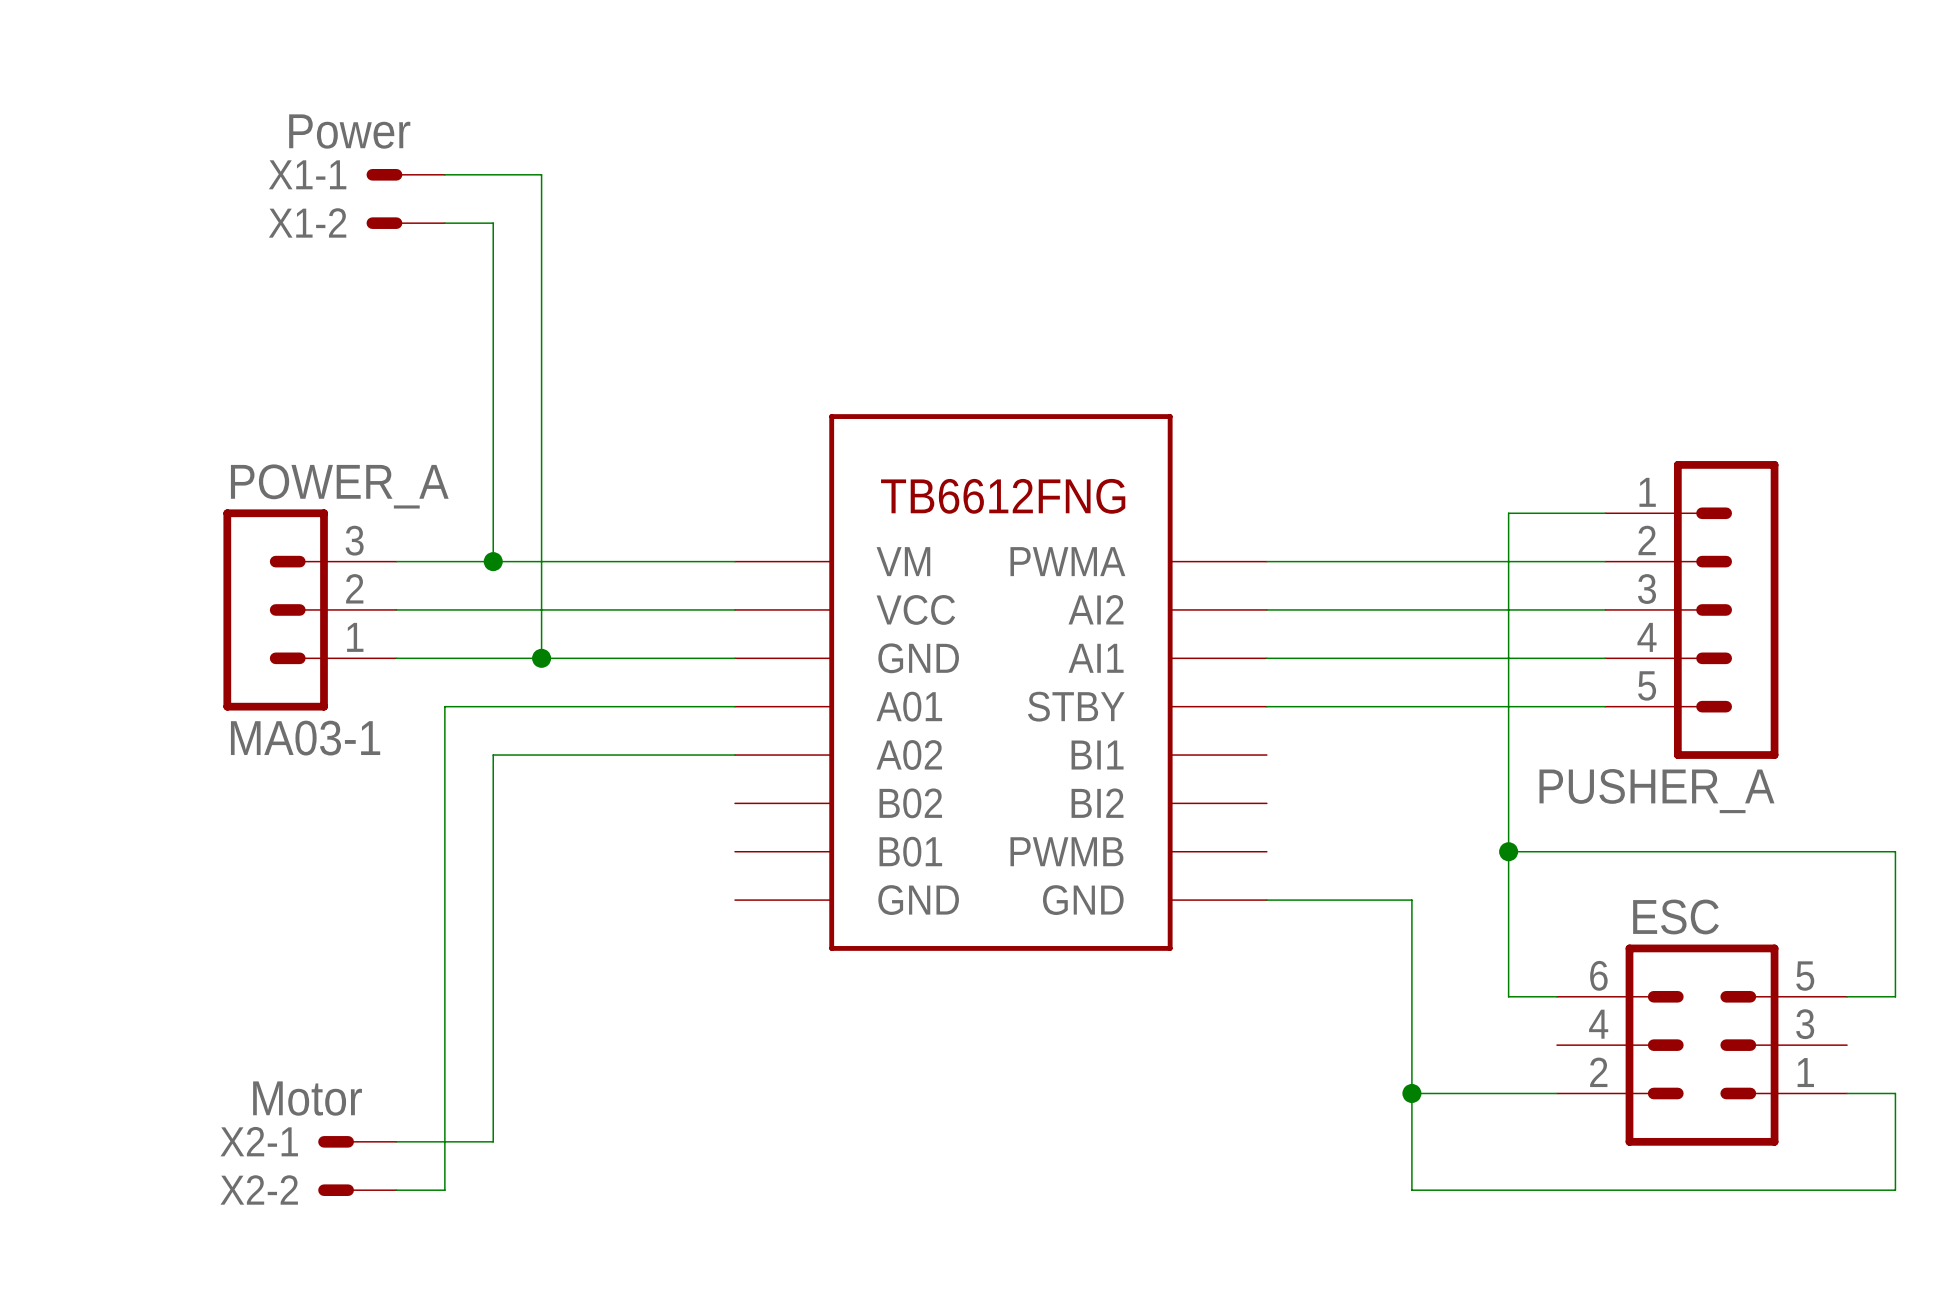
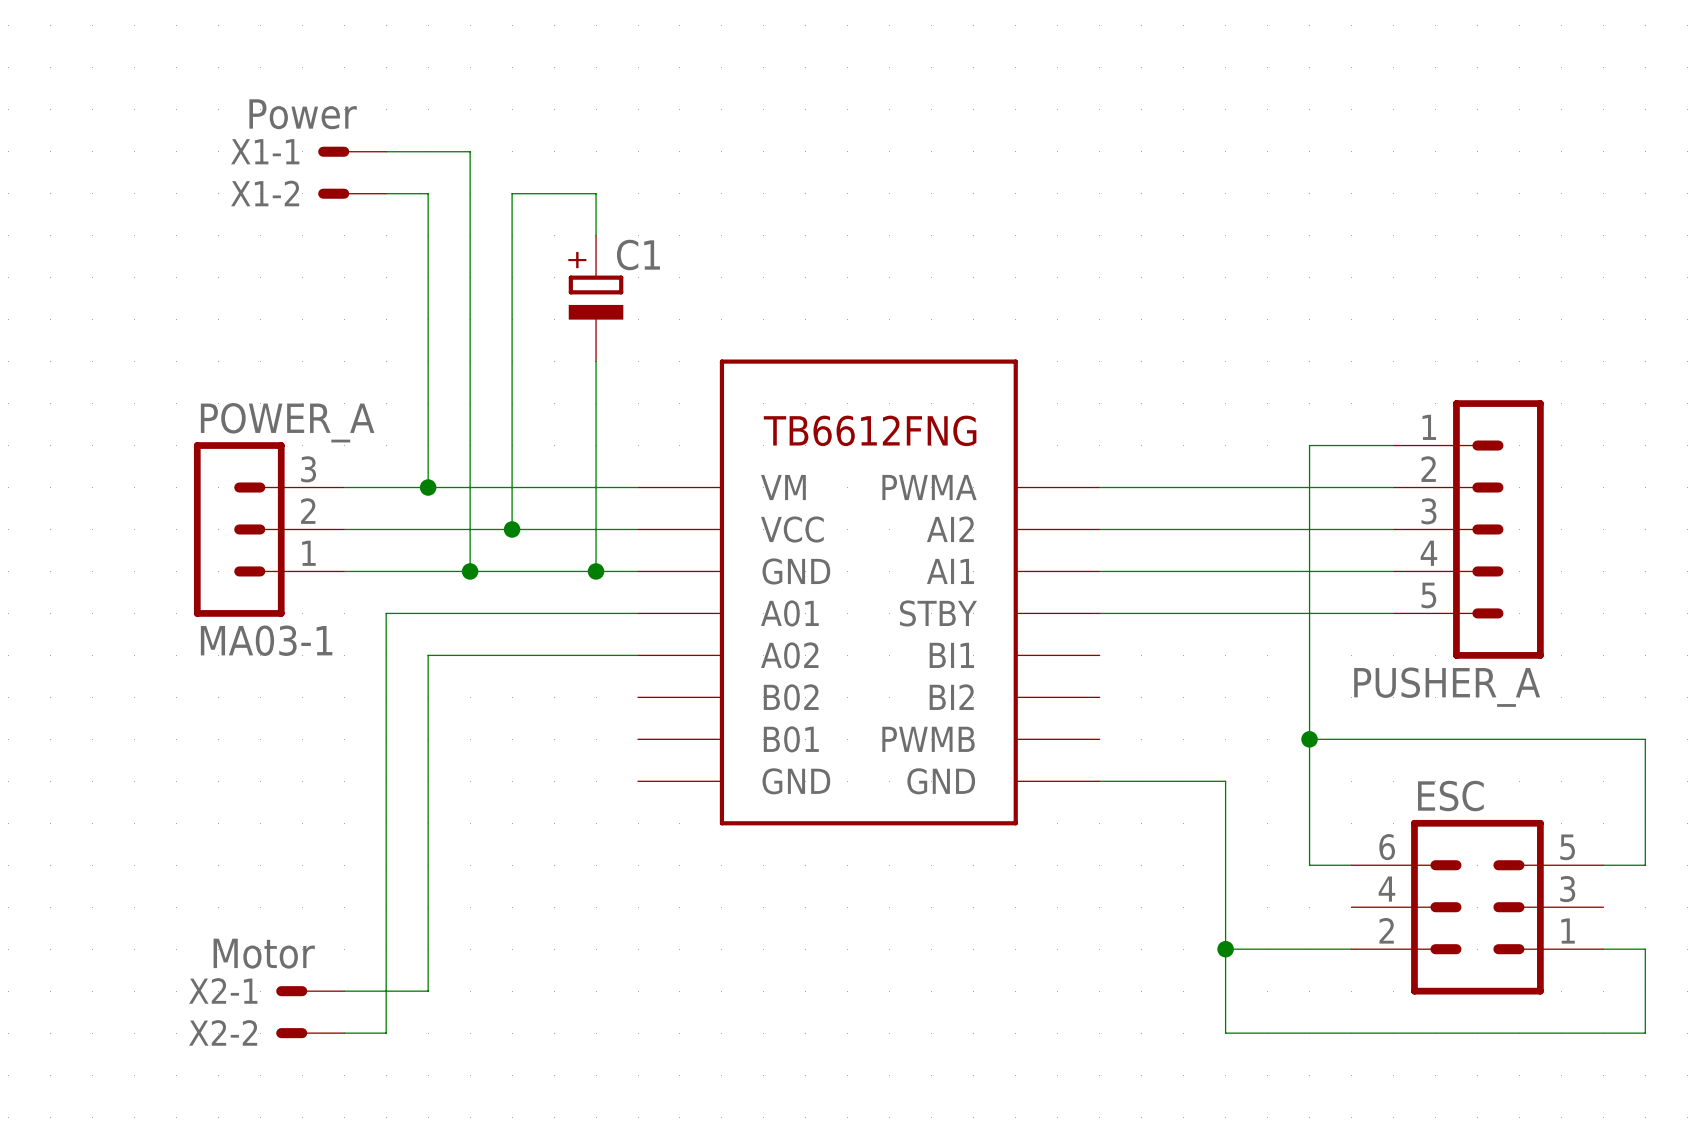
wire: none -> (596, 235) (596, 193) (512, 193) (512, 529)
C1: none -> (596, 298)
wire: none -> (596, 361) (596, 571)
junction: none -> (512, 529)
junction: none -> (596, 571)

